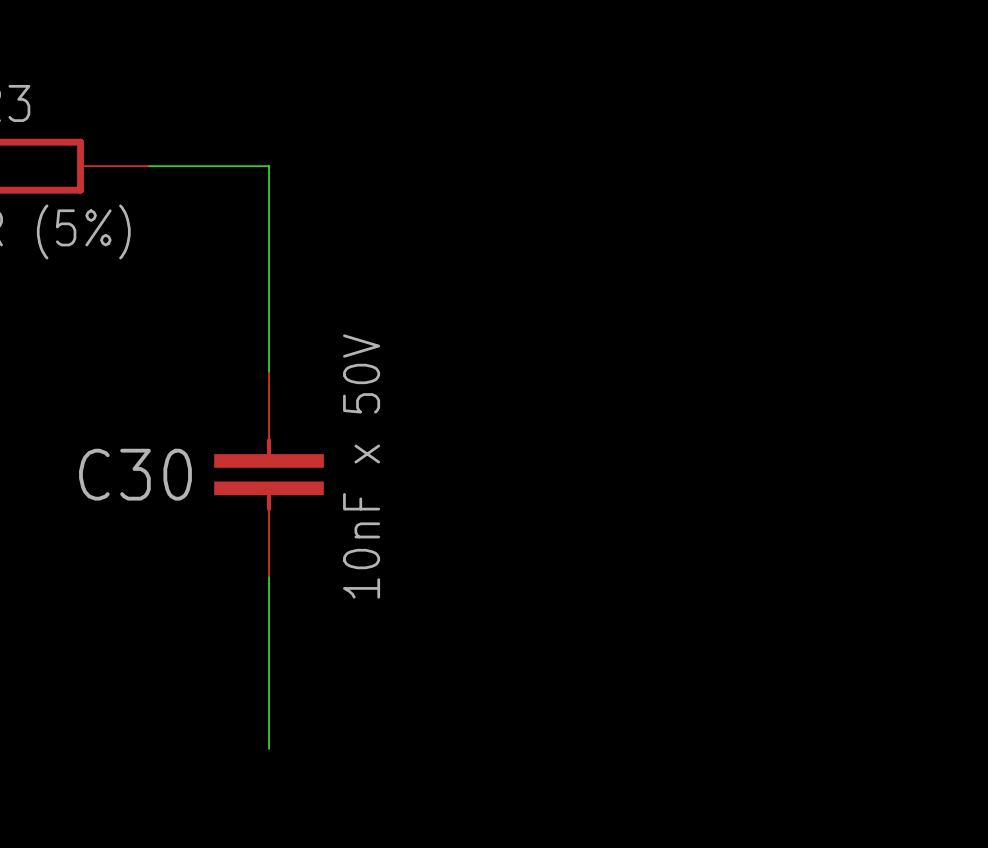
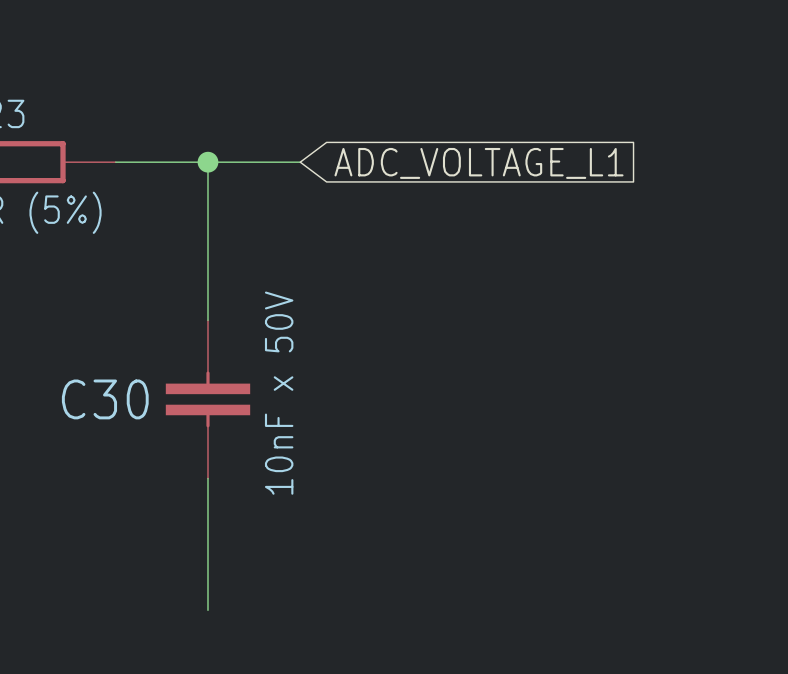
wire: none -> (207, 162) (300, 162)
junction: none -> (207, 162)
global label: none -> ADC_VOLTAGE_L1 (479, 163)

